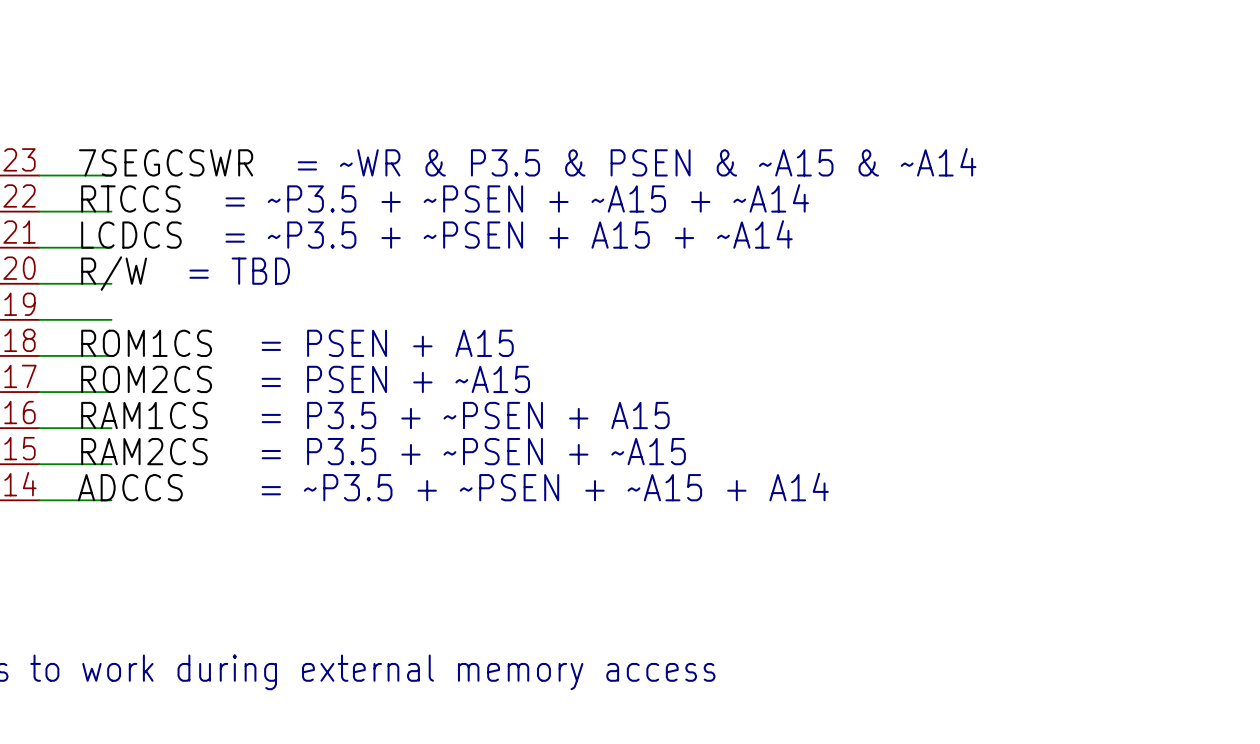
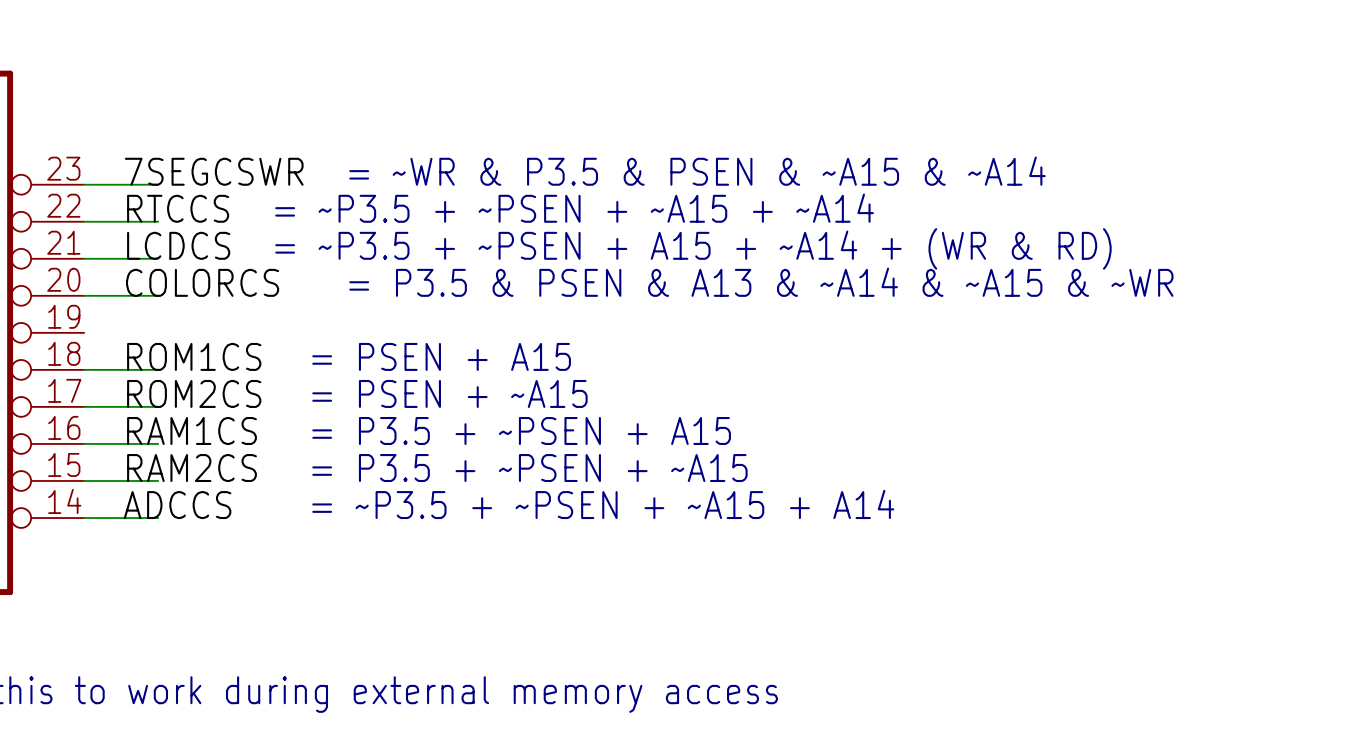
text: = ~P3.5 + ~PSEN + A15 + ~A14 (509, 234) -> = ~P3.5 + ~PSEN + A15 + ~A14 + (WR & RD) (693, 248)
text: none -> = P3.5 & PSEN & A13 & ~A14 & ~A15 & ~WR (761, 282)
text: = TBD (239, 271) -> none
label: R/W (114, 273) -> COLORCS (202, 282)
wire: (39, 319) (111, 319) -> none

